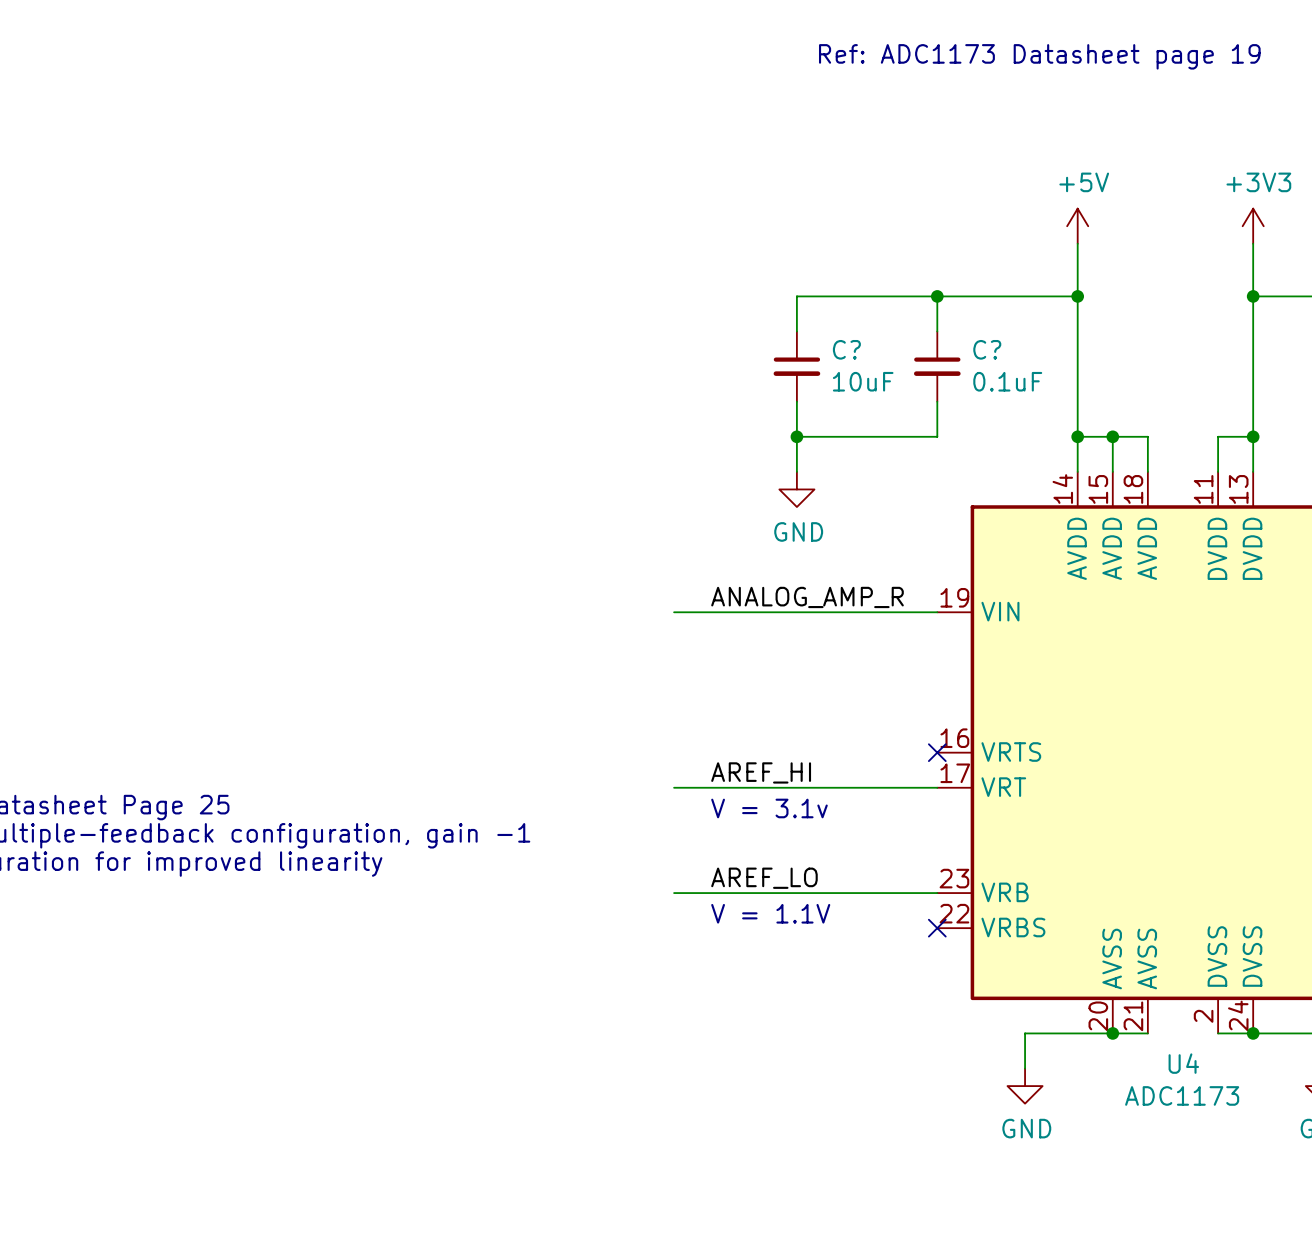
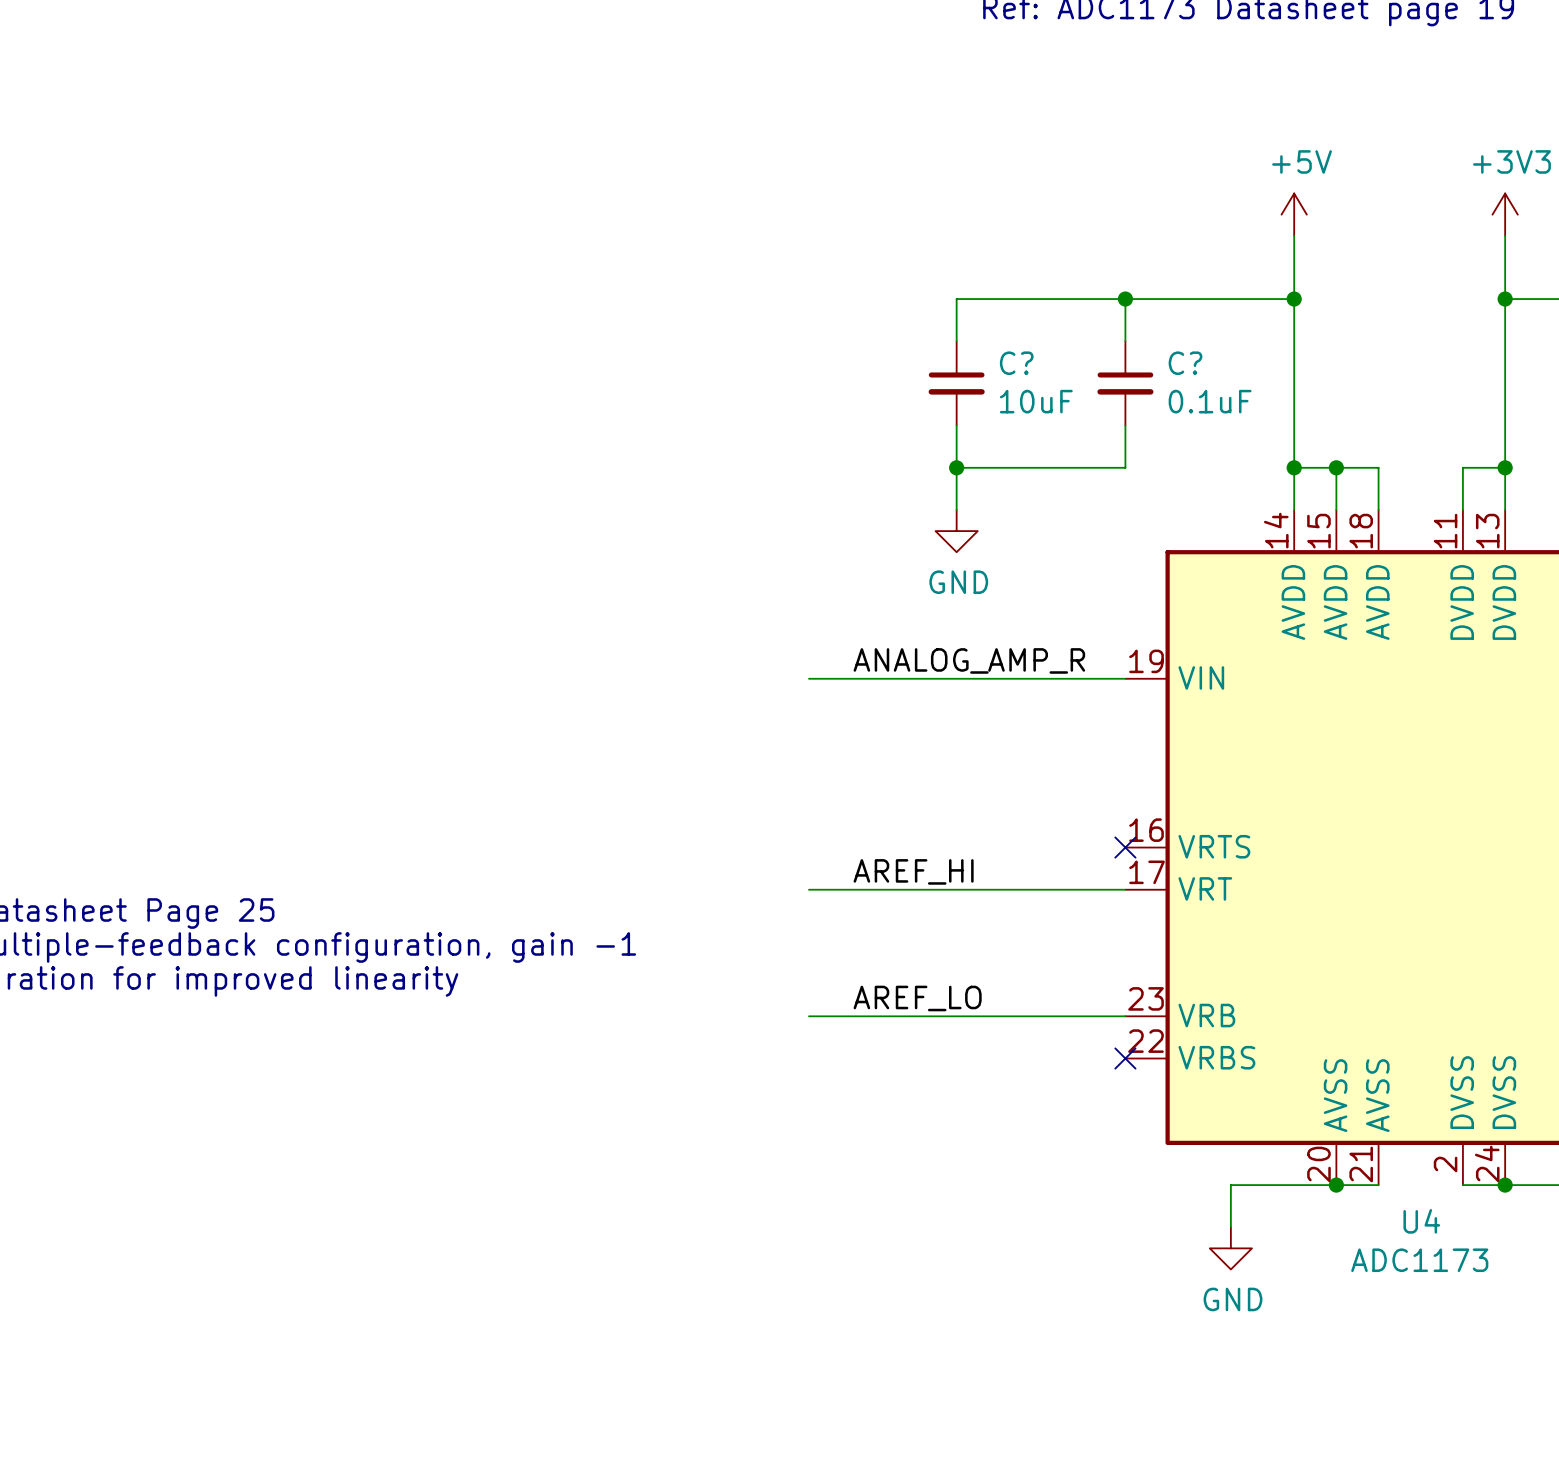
text: V = 3.1v (769, 808) -> none
text: V = 1.1V (770, 913) -> none

